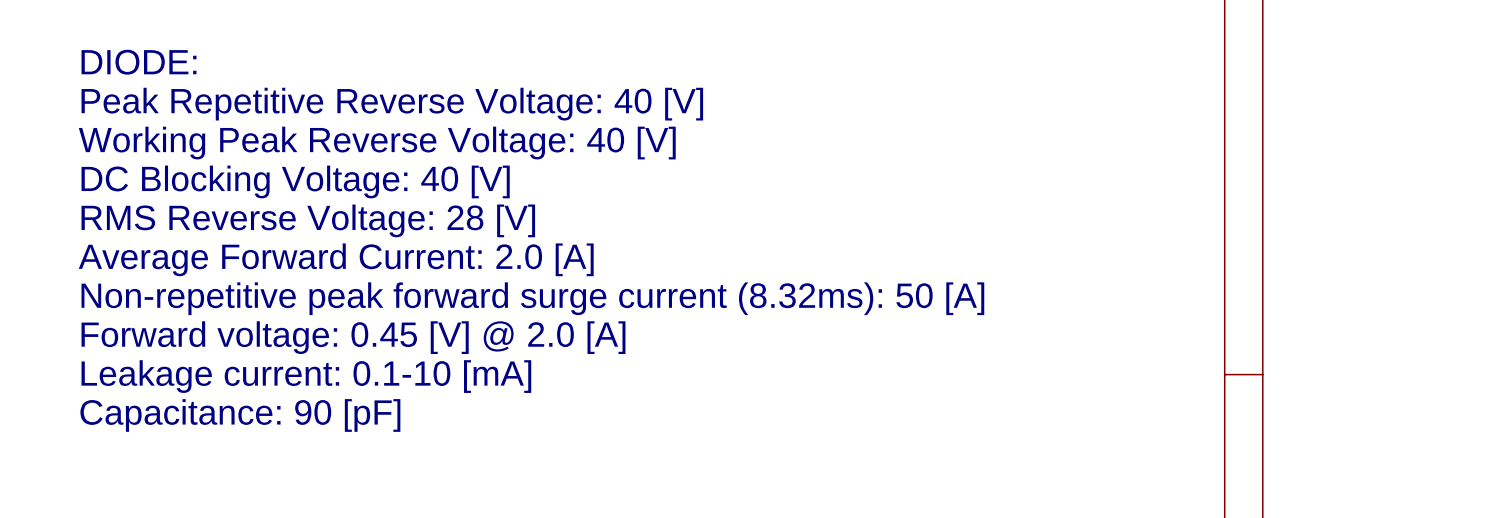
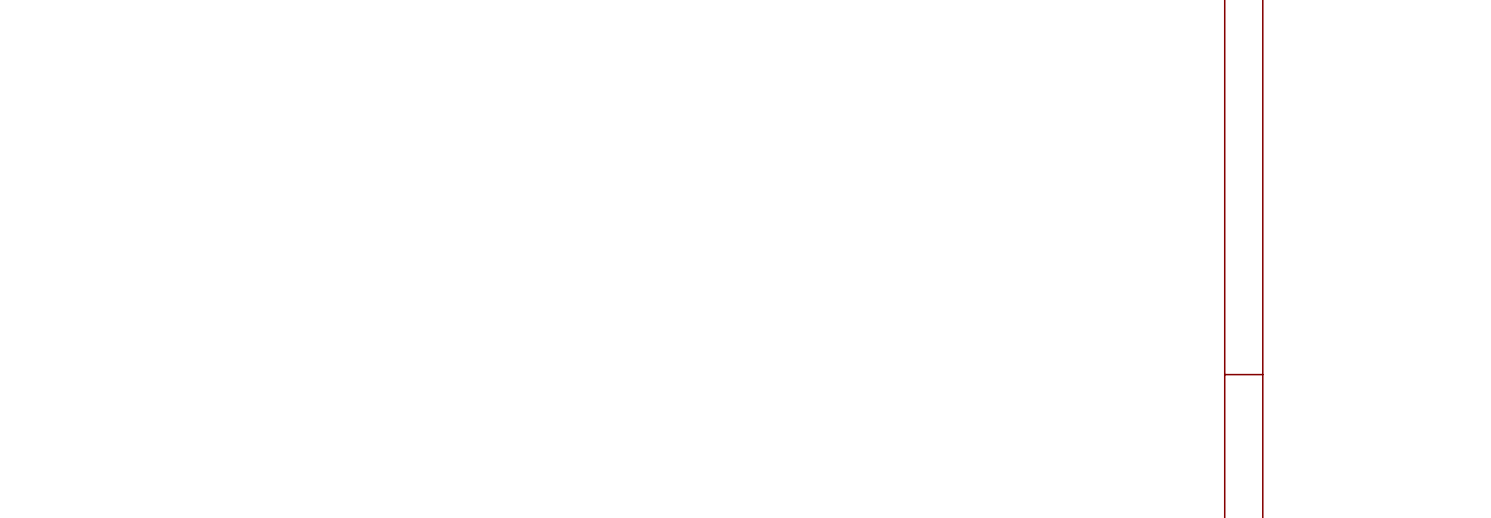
text: DIODE: (139, 62) -> none
text: Peak Repetitive Reverse Voltage: 40 [V] (392, 104) -> none
text: Working Peak Reverse Voltage: 40 [V] (377, 143) -> none
text: DC Blocking Voltage: 40 [V] (295, 181) -> none
text: RMS Reverse Voltage: 28 [V] (308, 220) -> none
text: Average Forward Current: 2.0 [A] (336, 259) -> none
text: Non-repetitive peak forward surge current (8.32ms): 50 [A] (532, 298) -> none
text: Forward voltage: 0.45 [V] @ 2.0 [A] (353, 337) -> none
text: Leakage current: 0.1-10 [mA] (306, 376) -> none
text: Capacitance: 90 [pF] (240, 415) -> none

